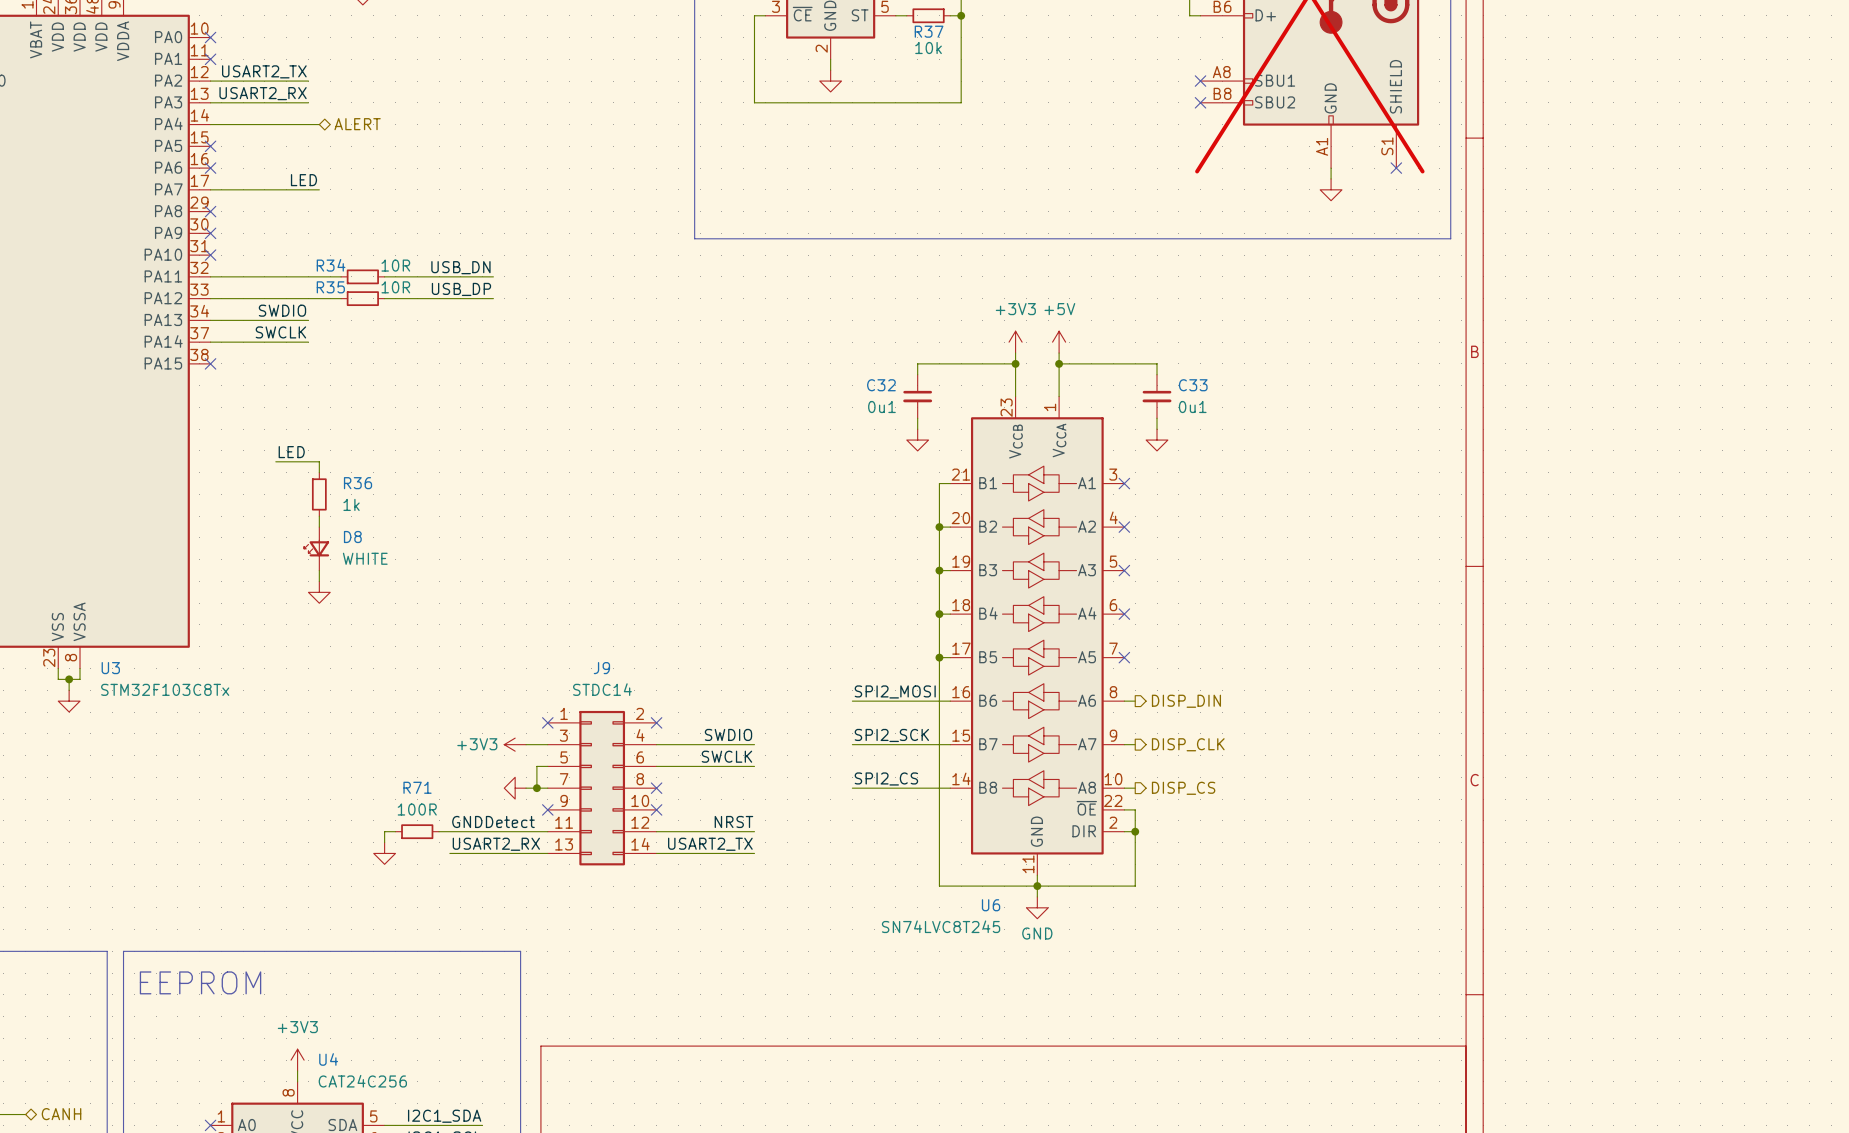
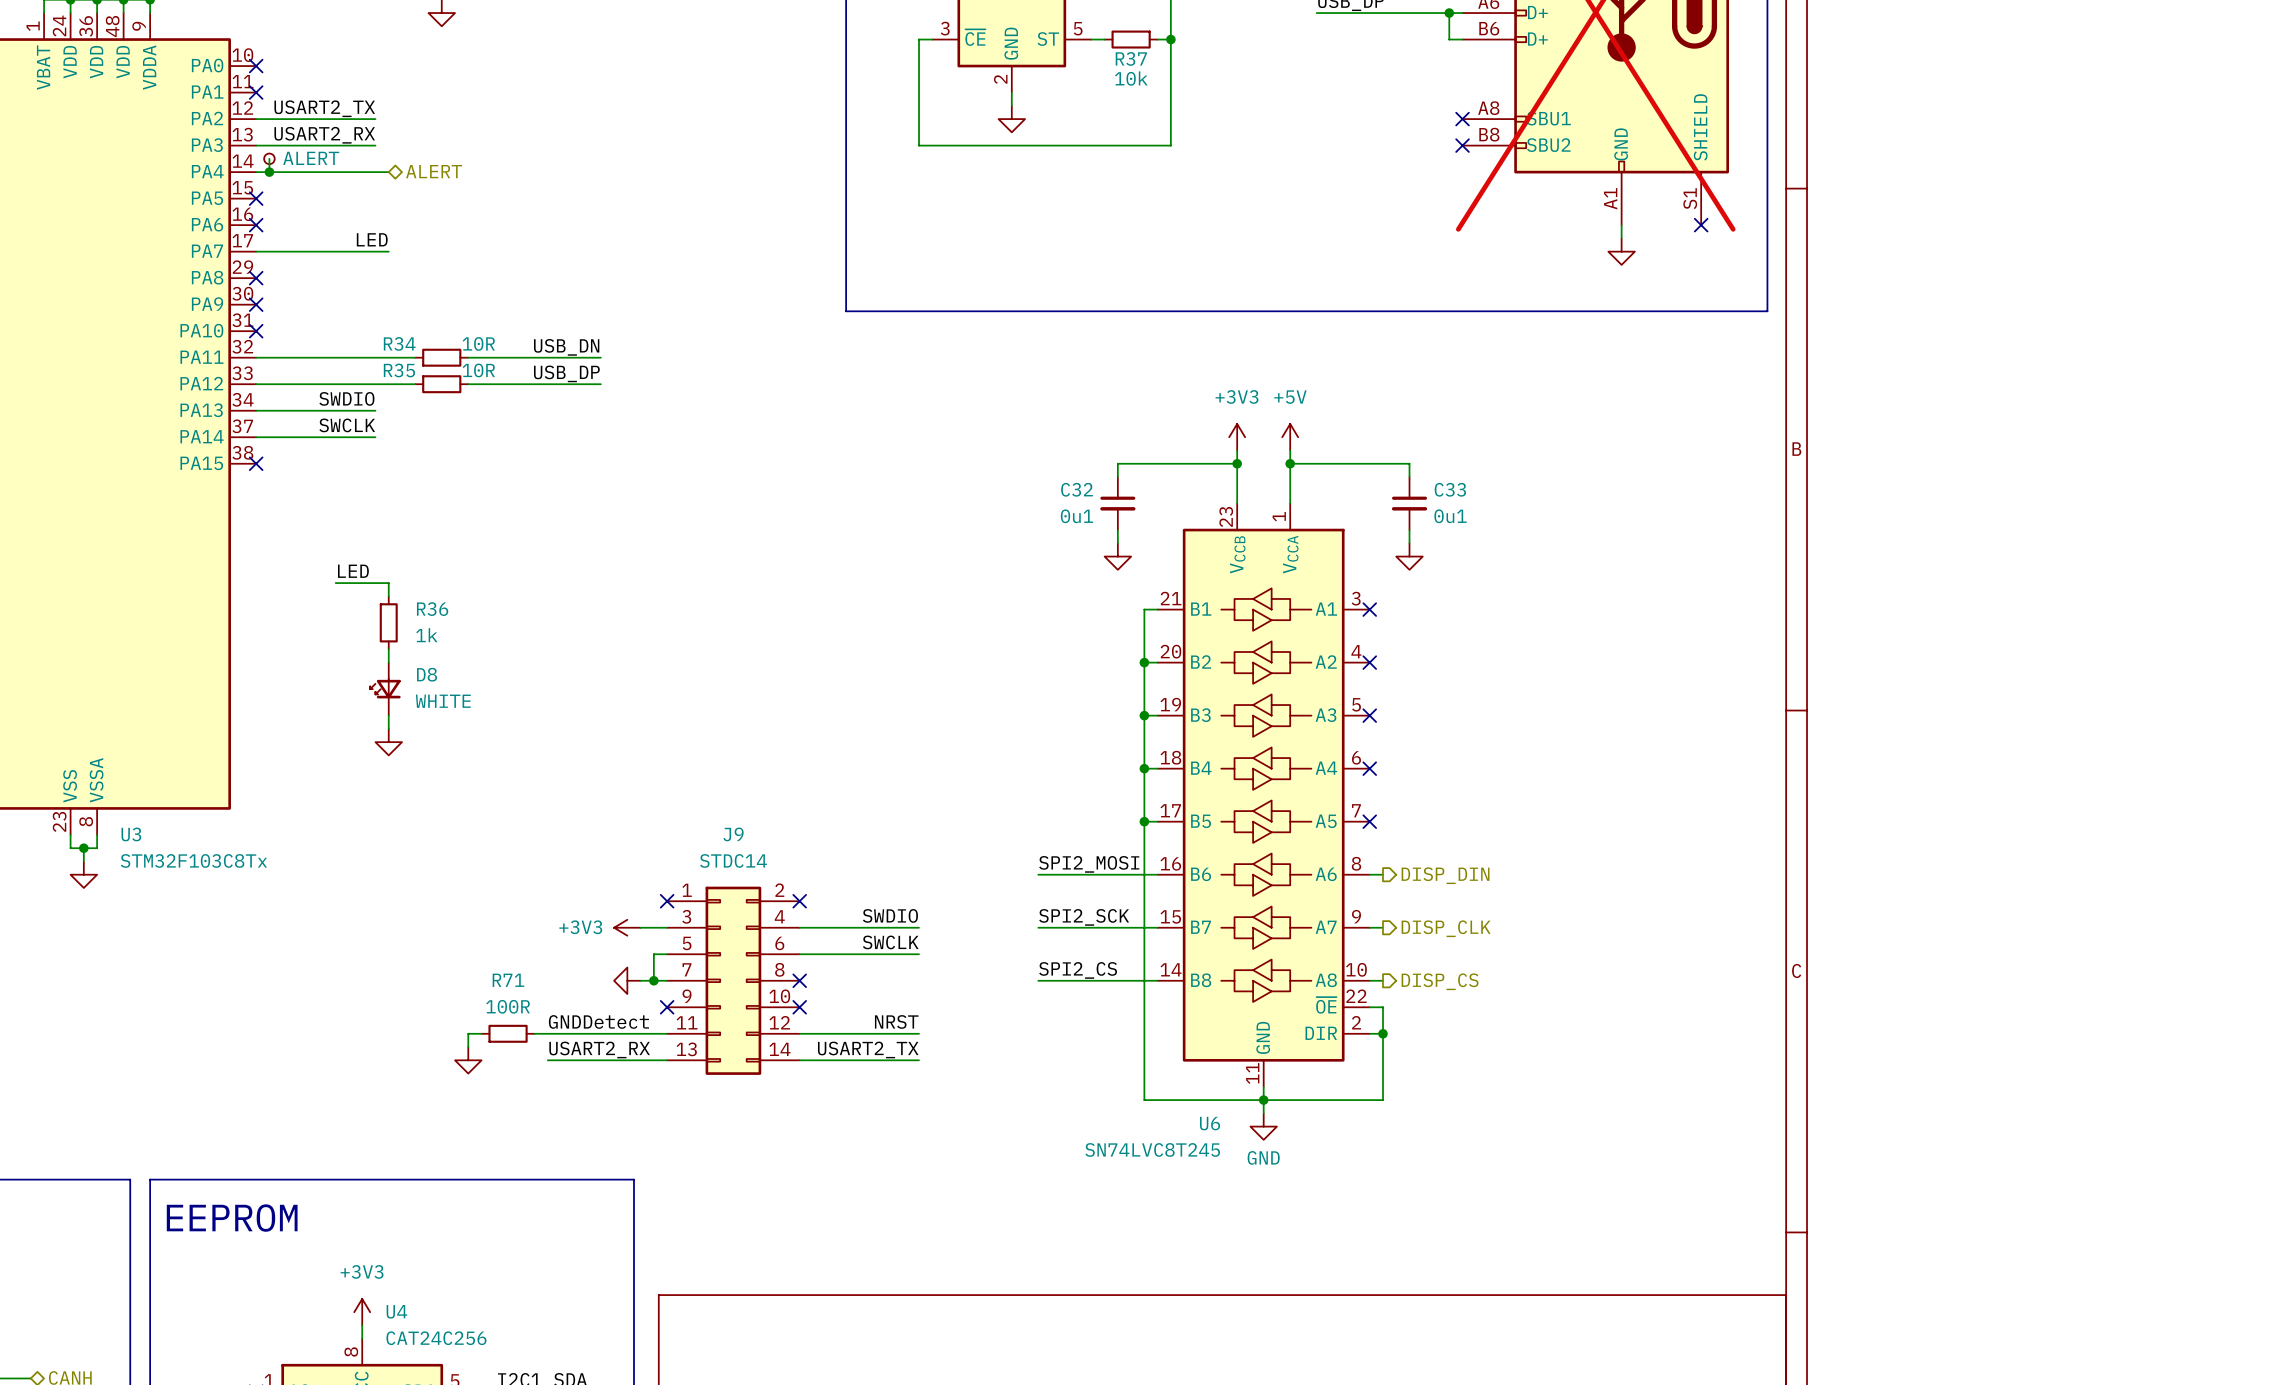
wire: none -> (269, 158) (269, 172)
part: none -> ALERT (269, 158)
junction: none -> (269, 172)

